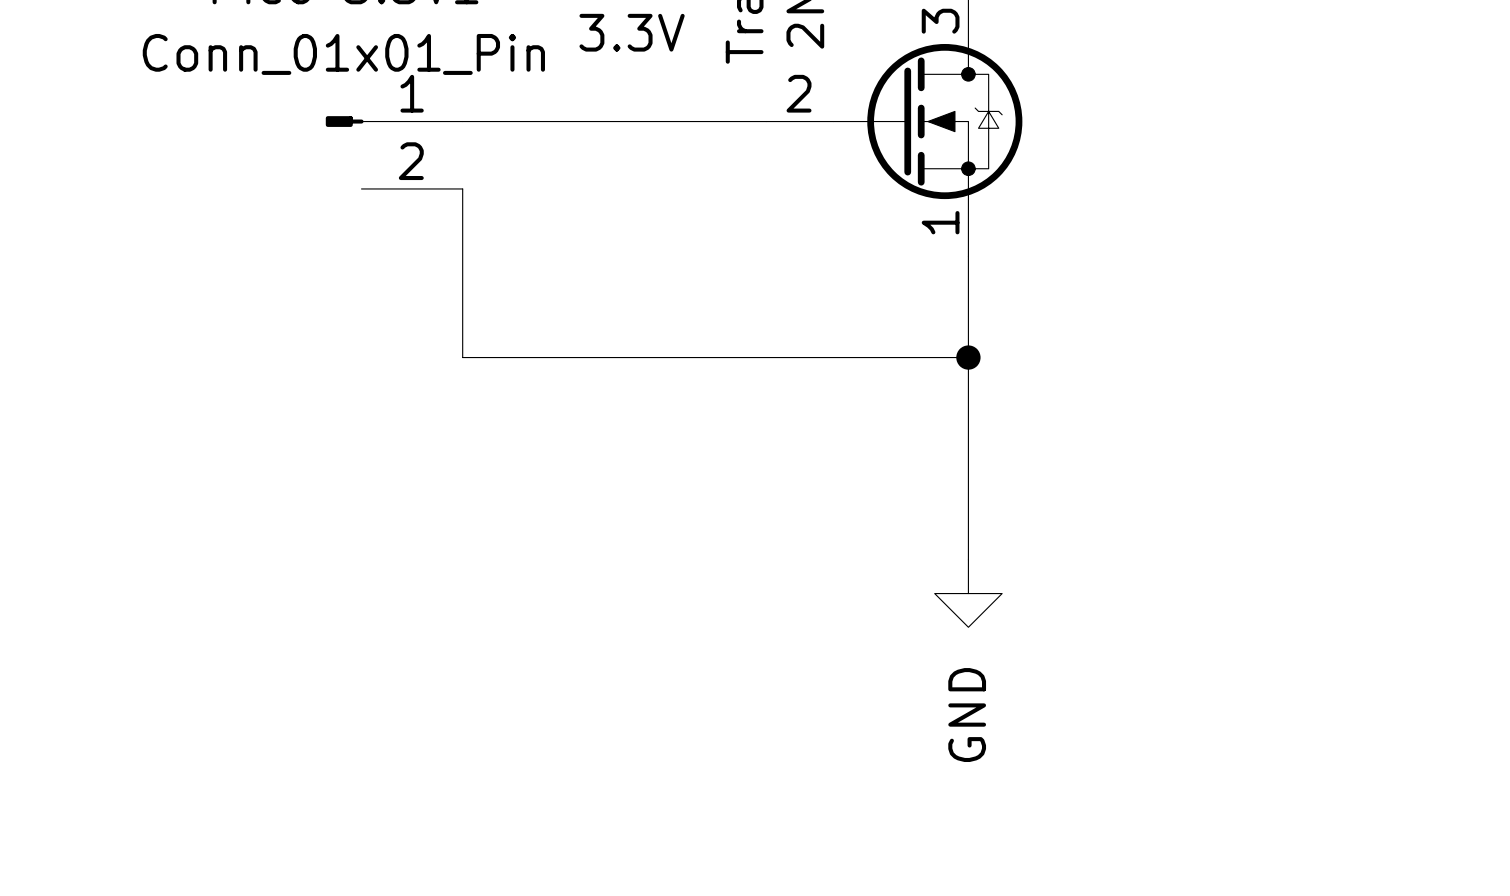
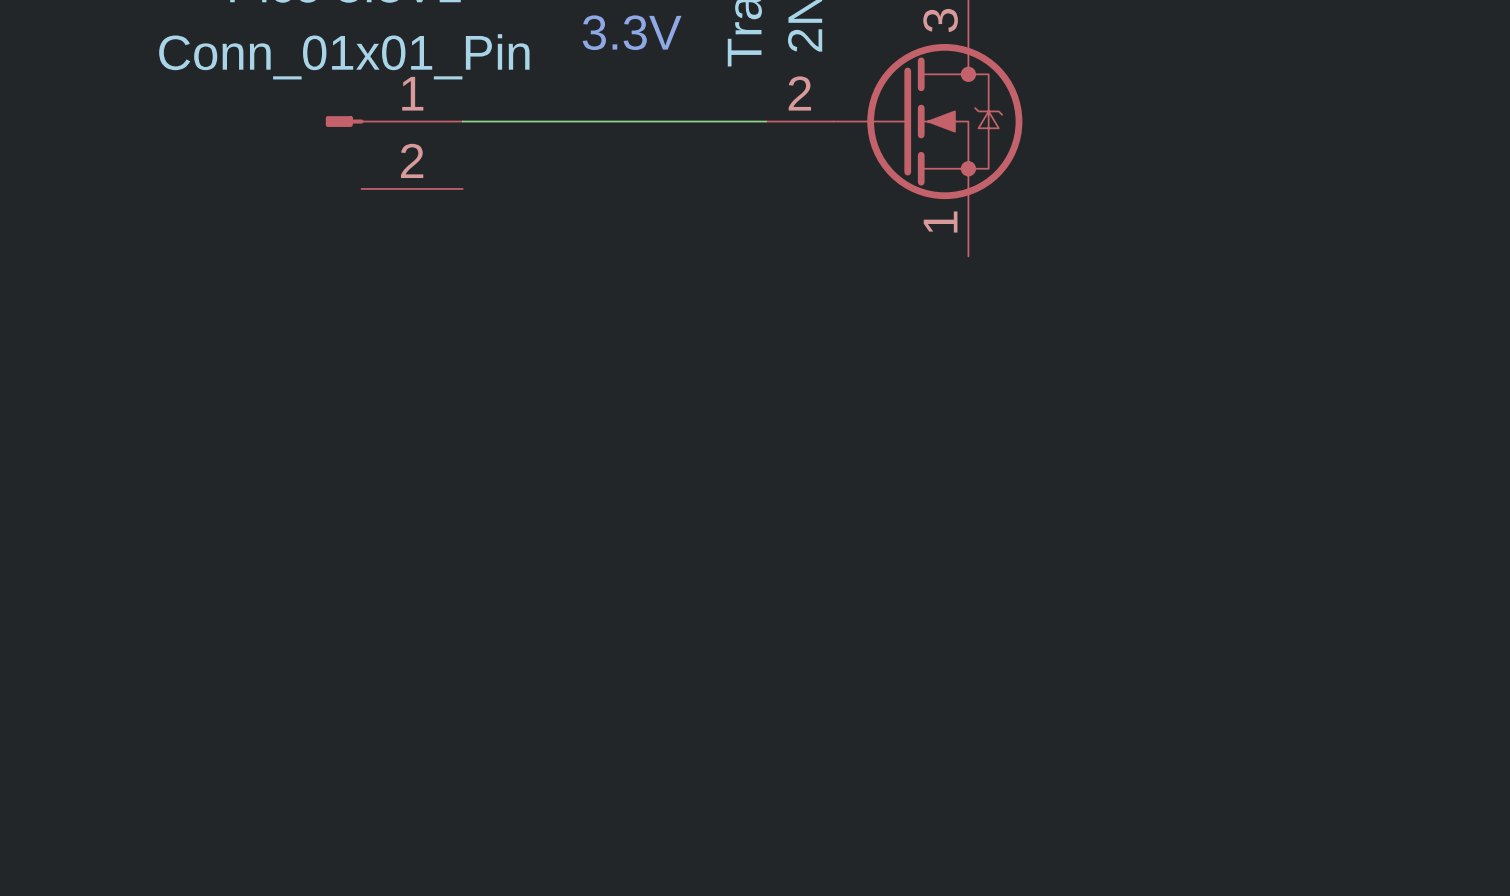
wire: (462, 188) (462, 357) (968, 357) -> none
wire: (968, 256) (968, 559) -> none
junction: (968, 357) -> none
power symbol: GND (968, 593) -> none

